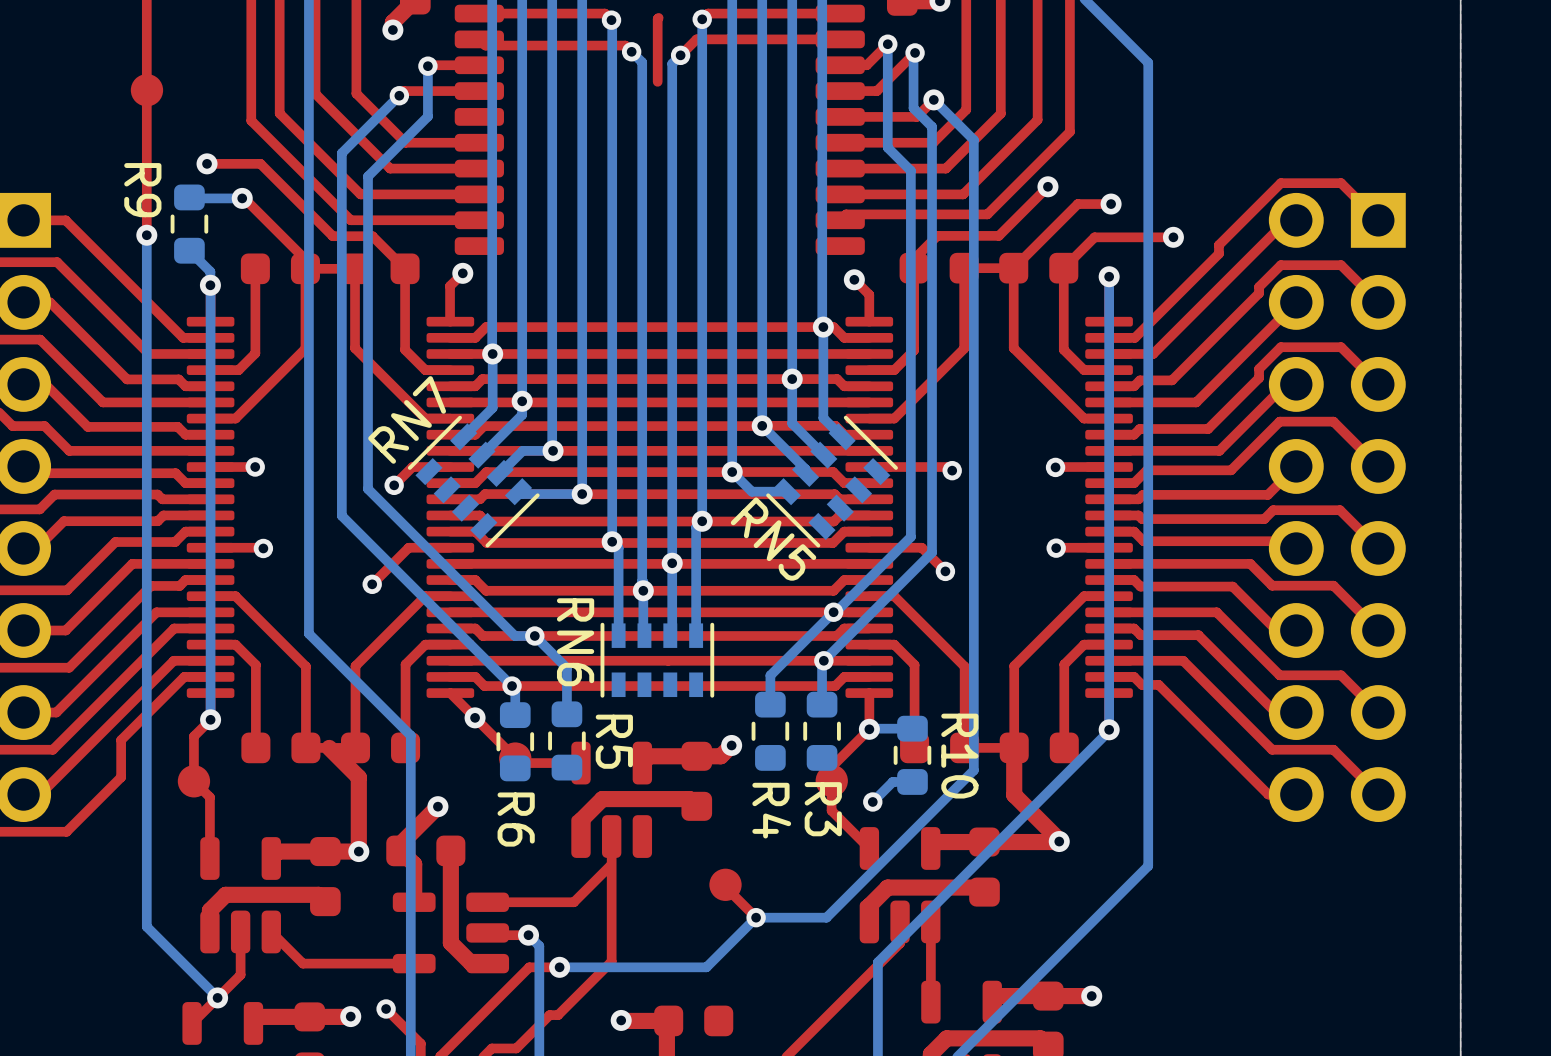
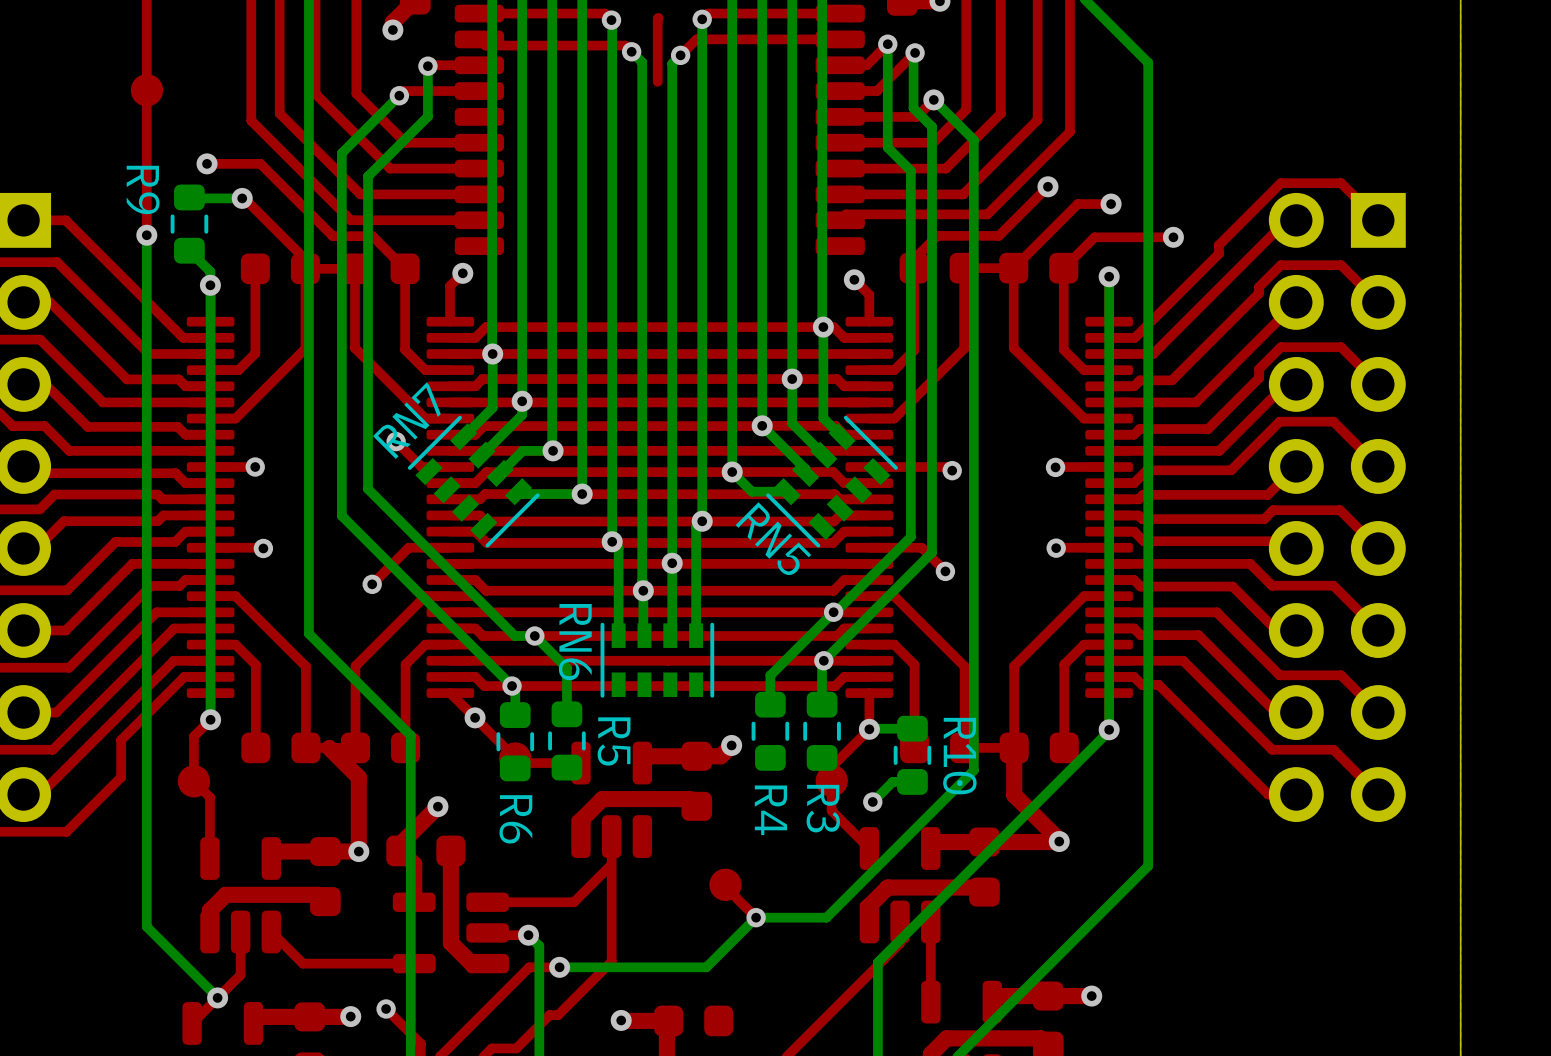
top track: (421, 467) (412, 467) (394, 485) -> (421, 467) (396, 441)
via position: (394, 485) -> (396, 441)

